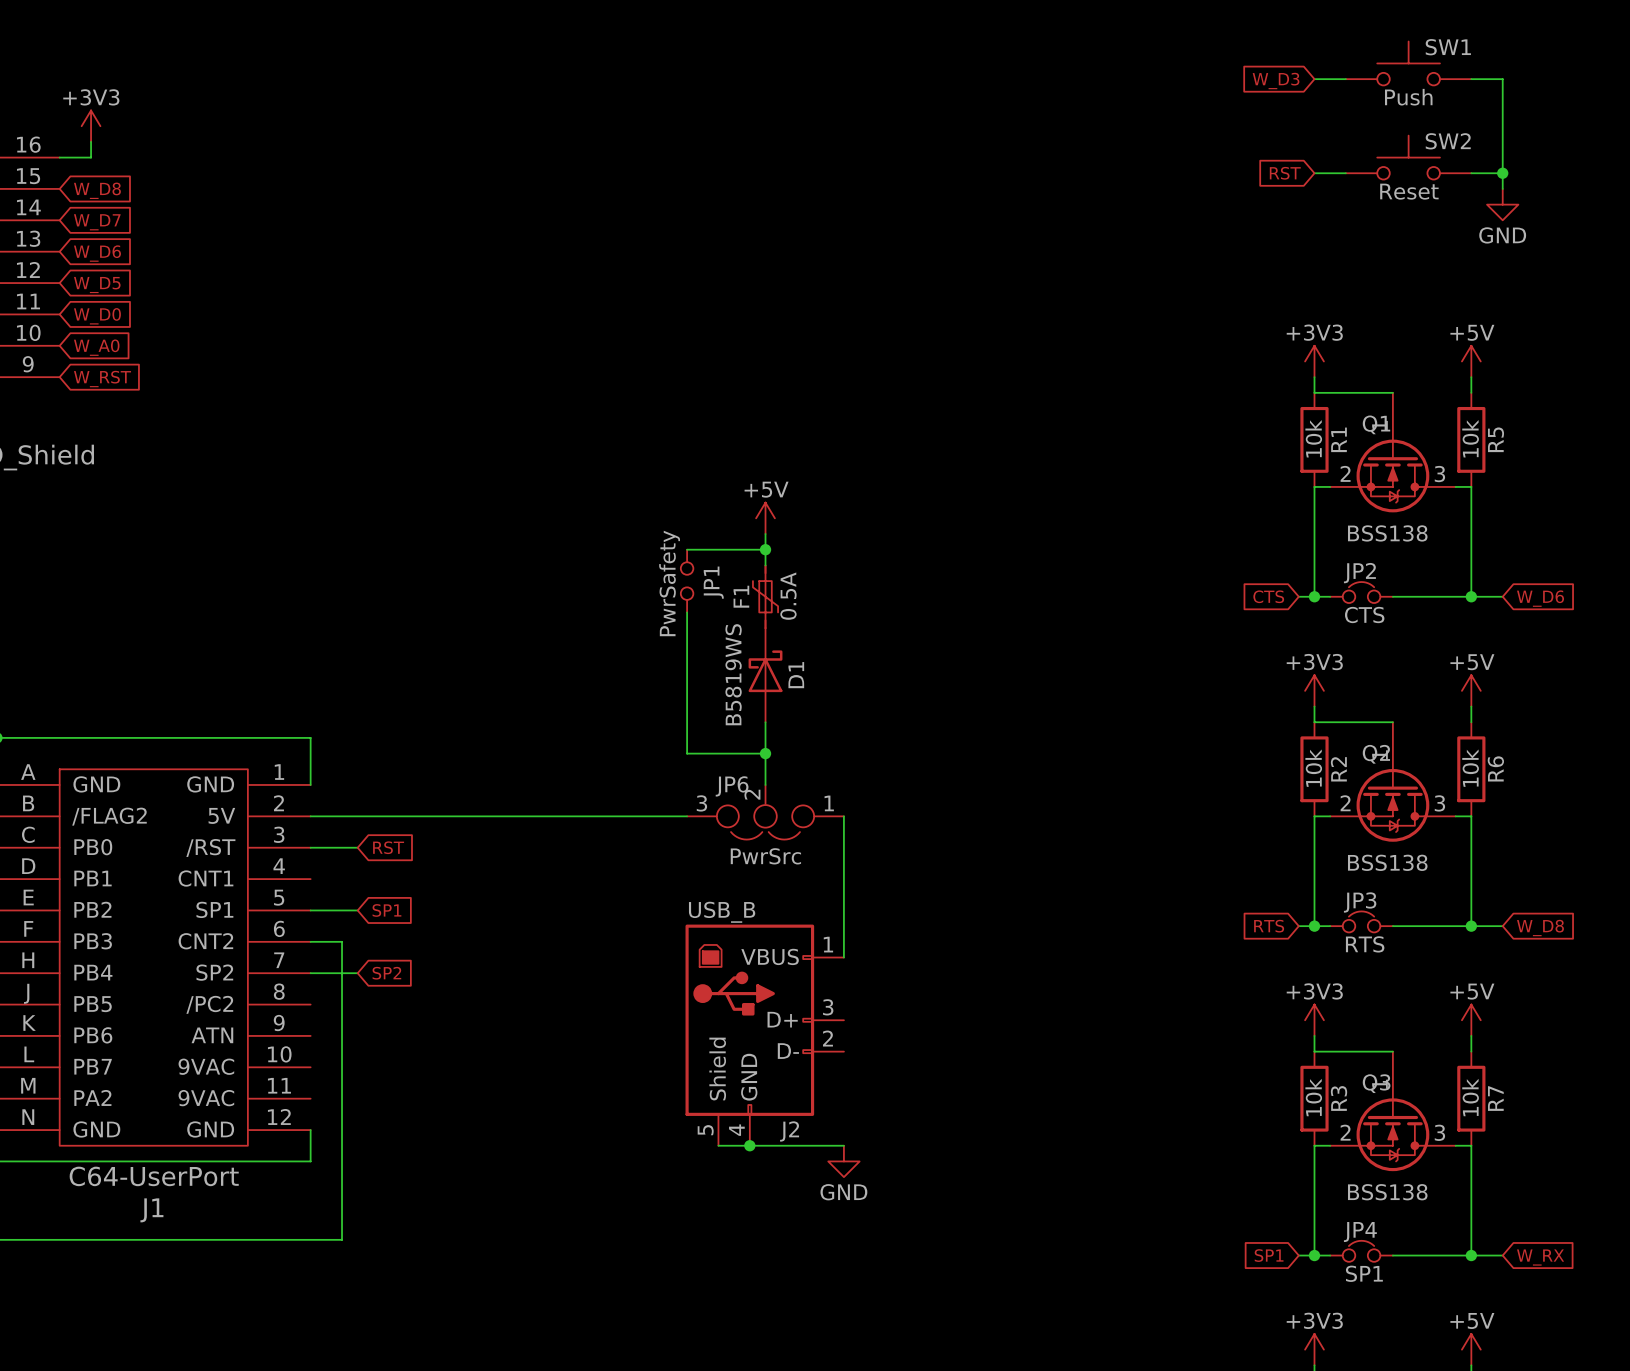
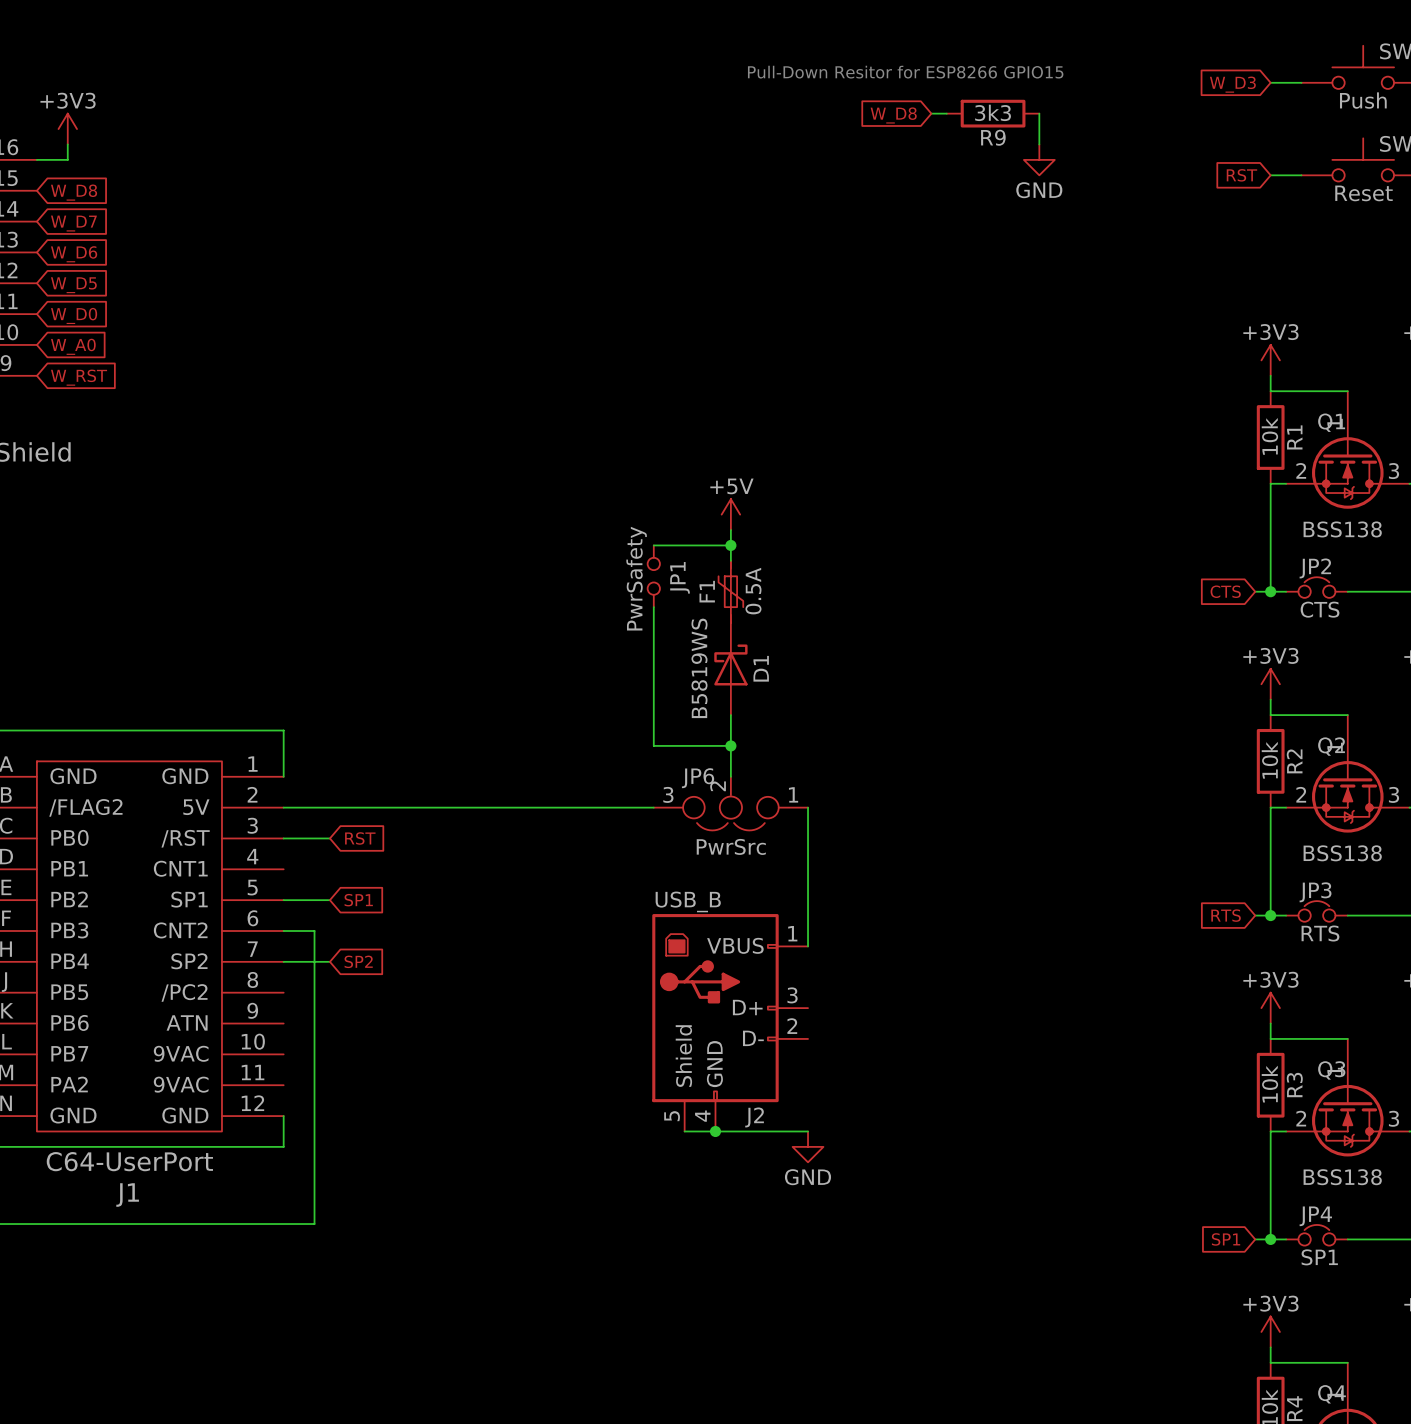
text: none -> Pull-Down Resitor for ESP8266 GPIO15 (905, 72)
wire: none -> (931, 113) (946, 113)
R9: none -> 3k3 (993, 113)
wire: none -> (1039, 113) (1039, 144)
global label: none -> W_D8 (893, 115)
power symbol: none -> GND (1039, 159)

